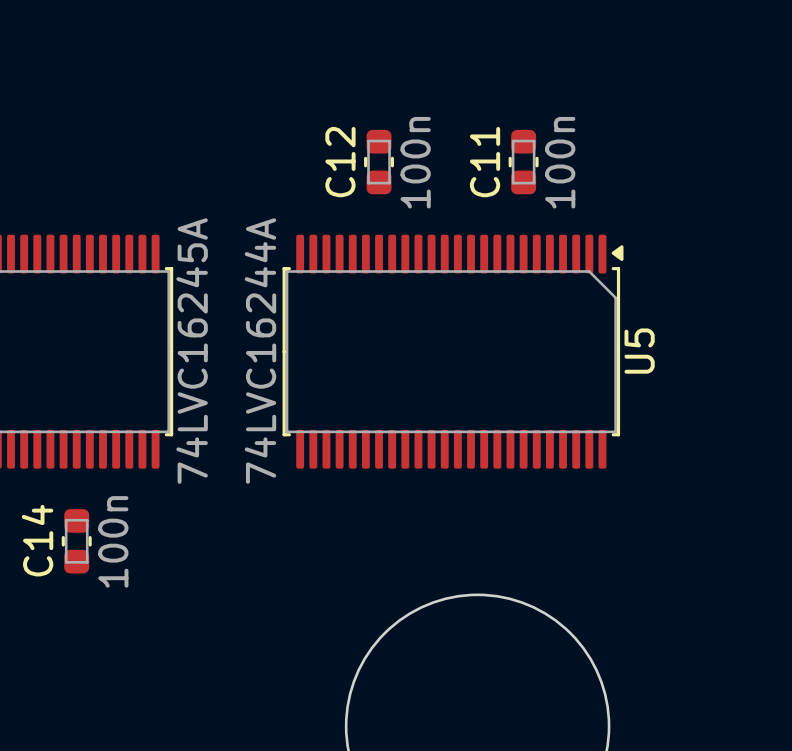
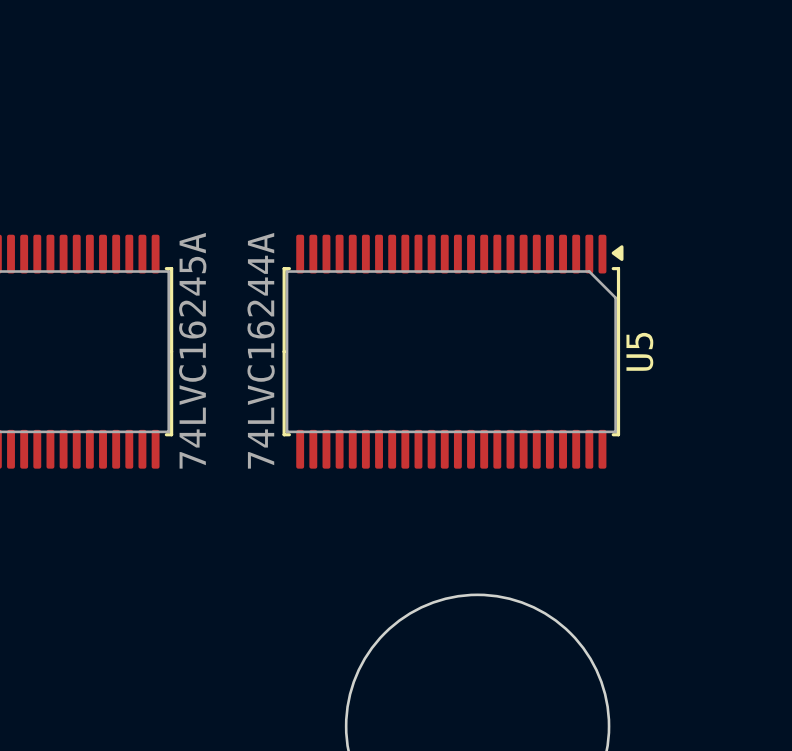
C12: 100n (379, 162) -> none
C11: 100n (523, 162) -> none
C14: 100n (76, 541) -> none

